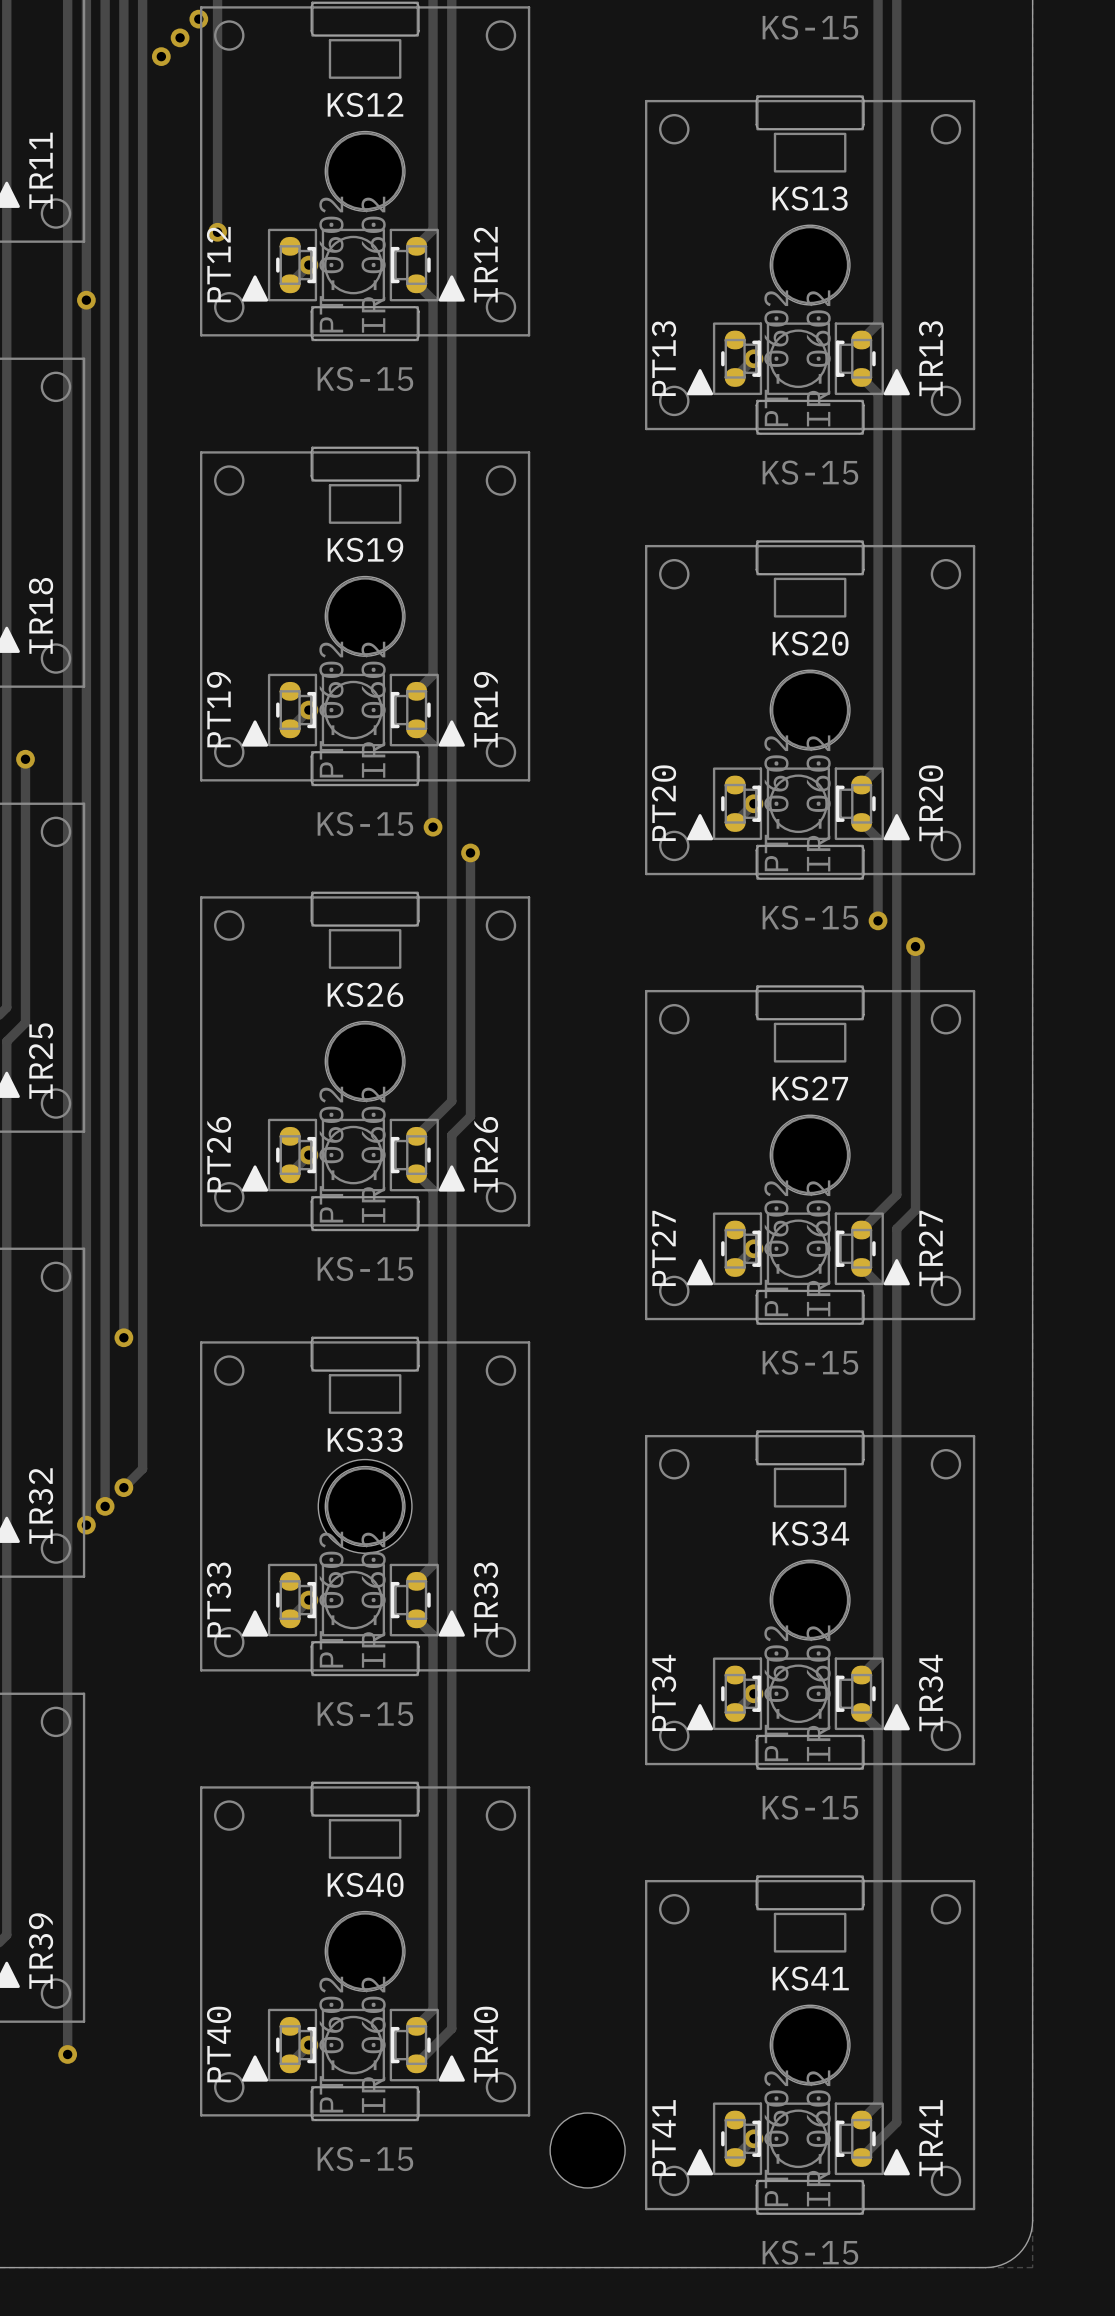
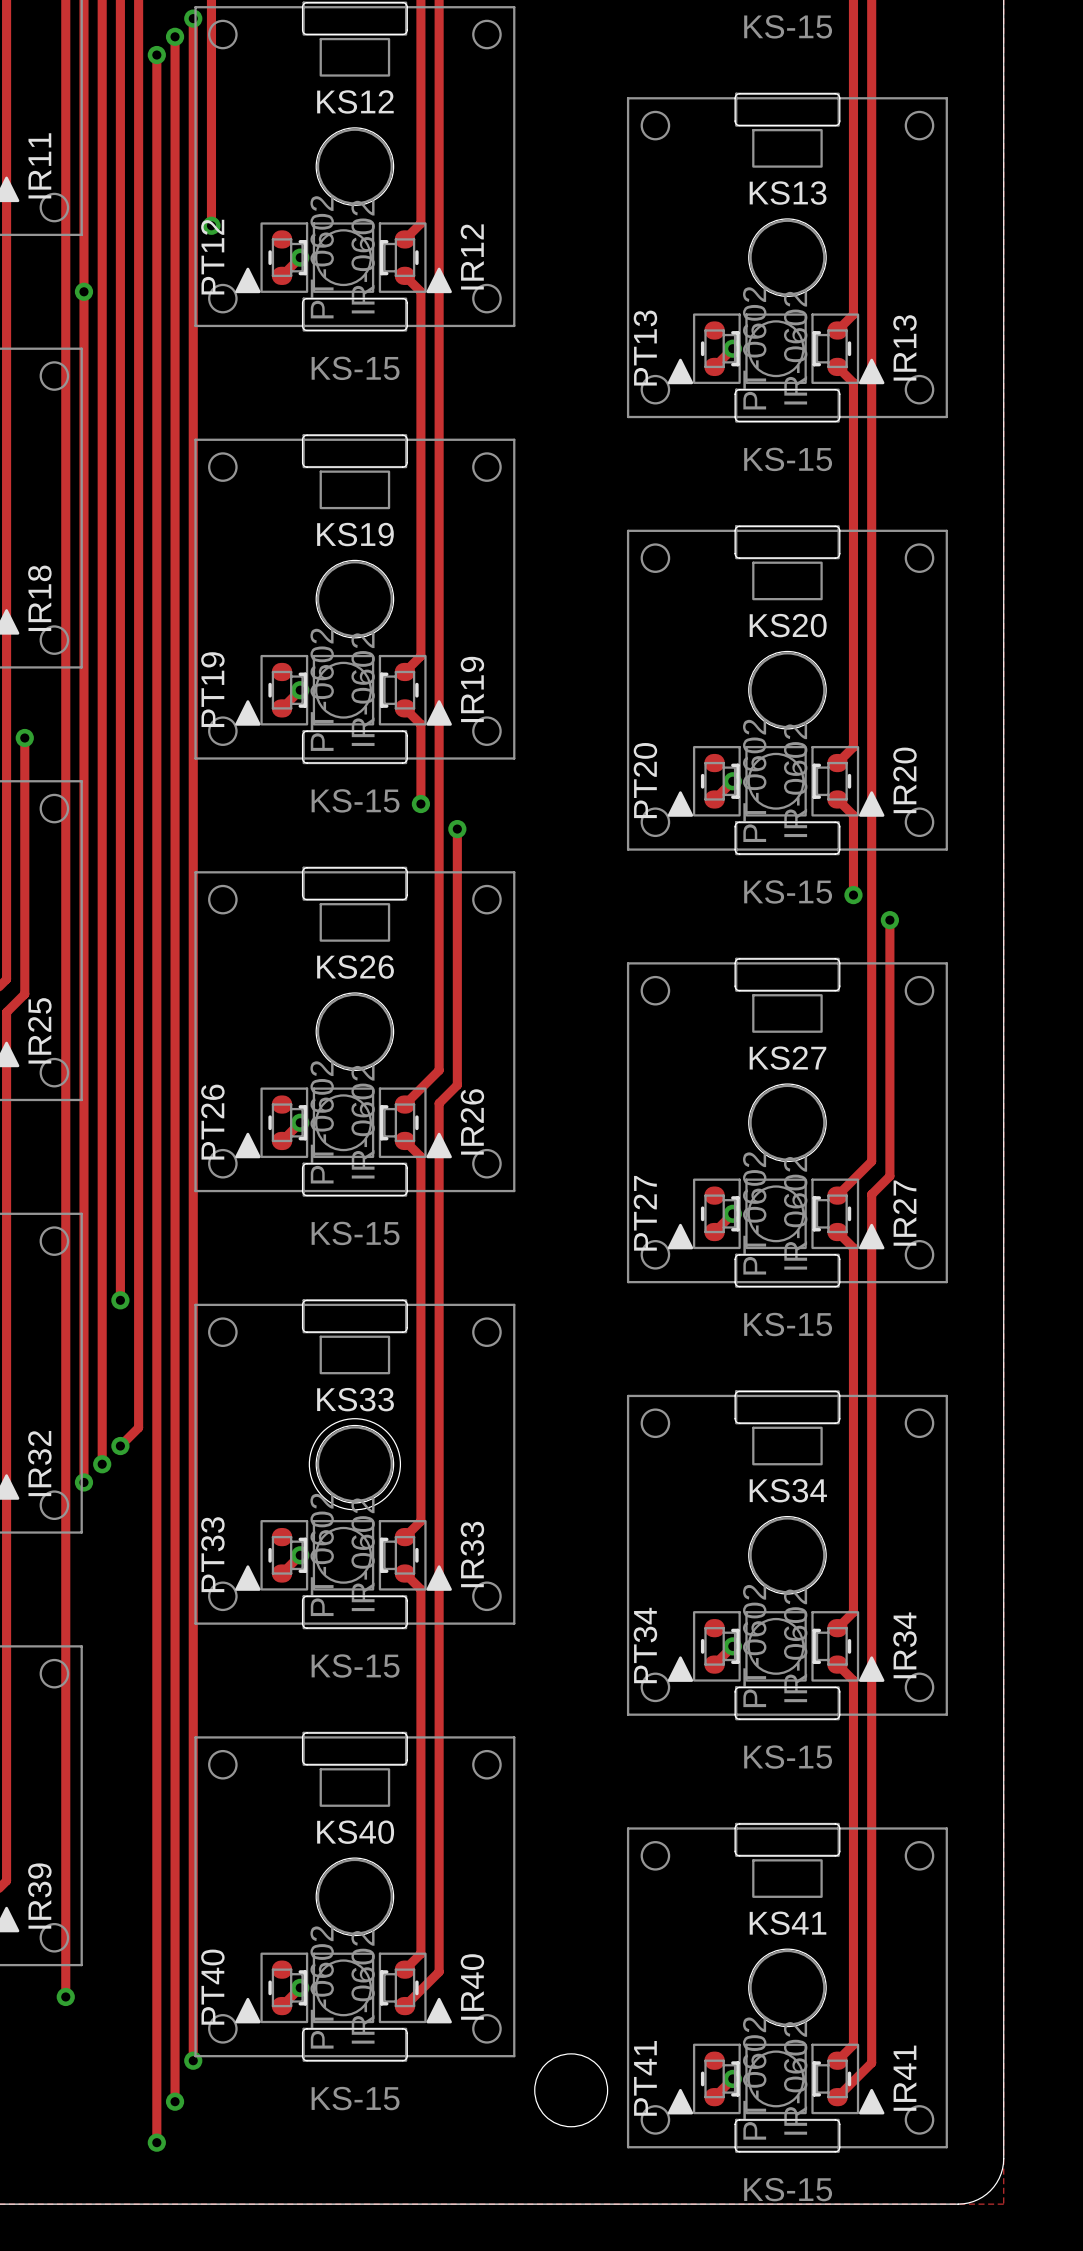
track: none -> (193, 18) (193, 2060)
track: none -> (175, 36) (175, 2101)
track: none -> (156, 55) (156, 2142)
via: none -> (193, 2060)
via: none -> (175, 2101)
via: none -> (156, 2142)

